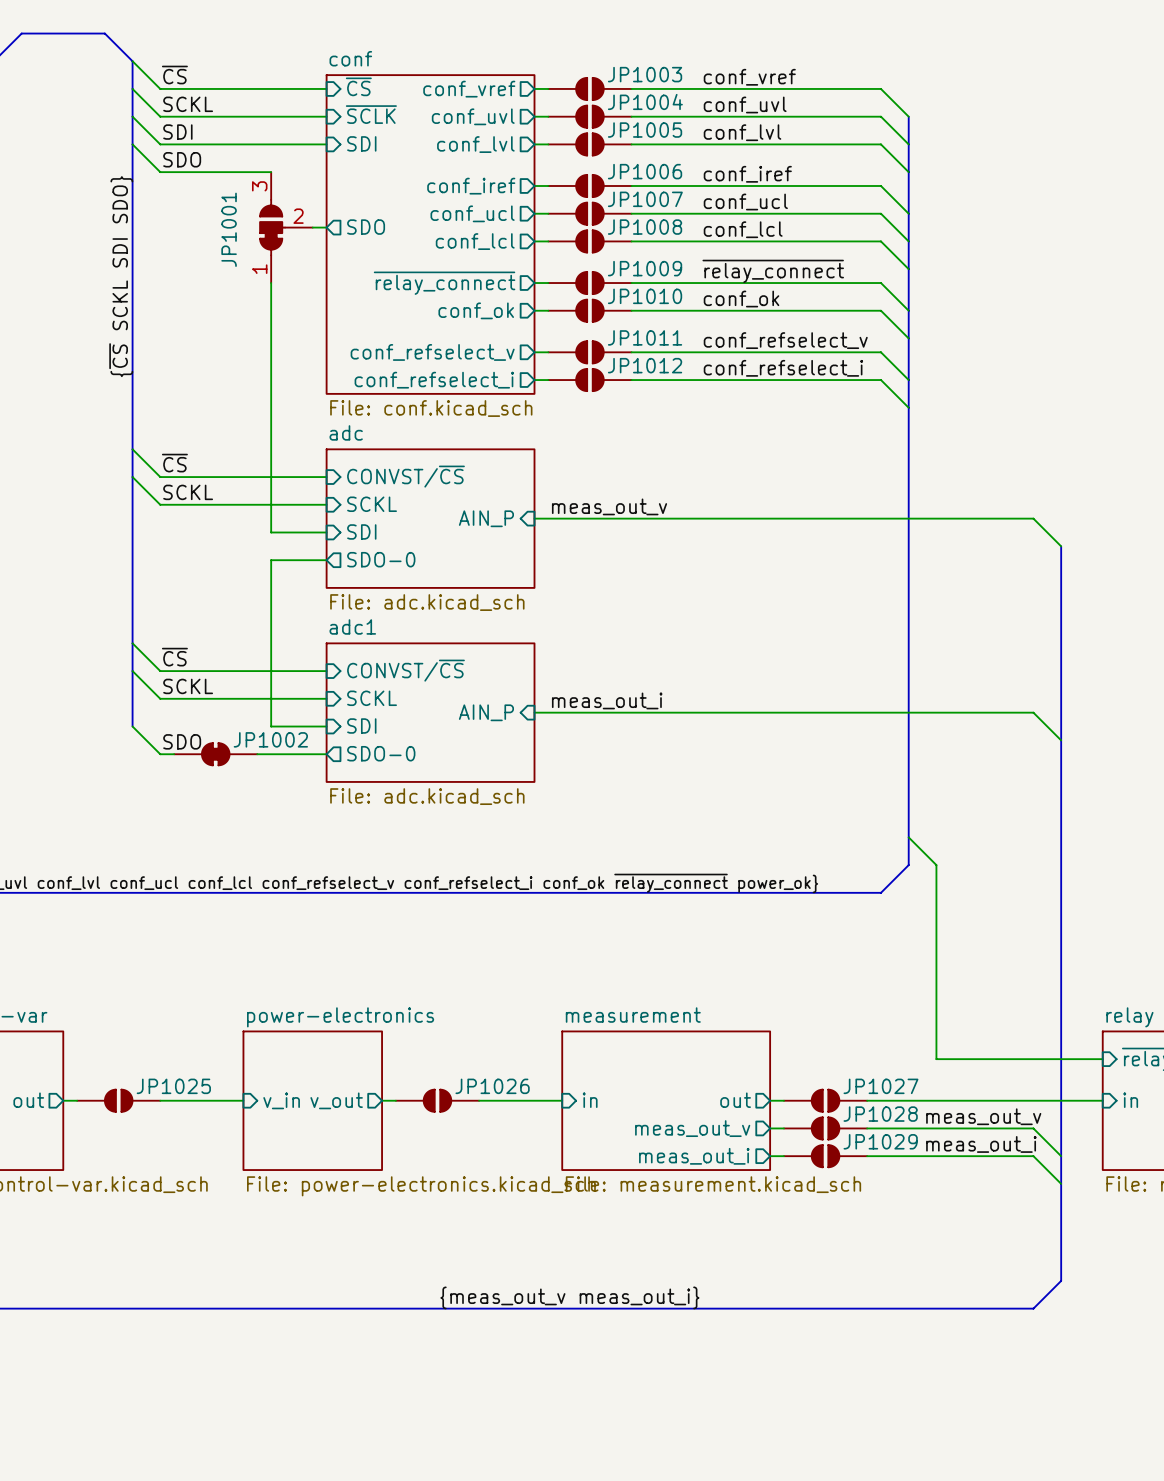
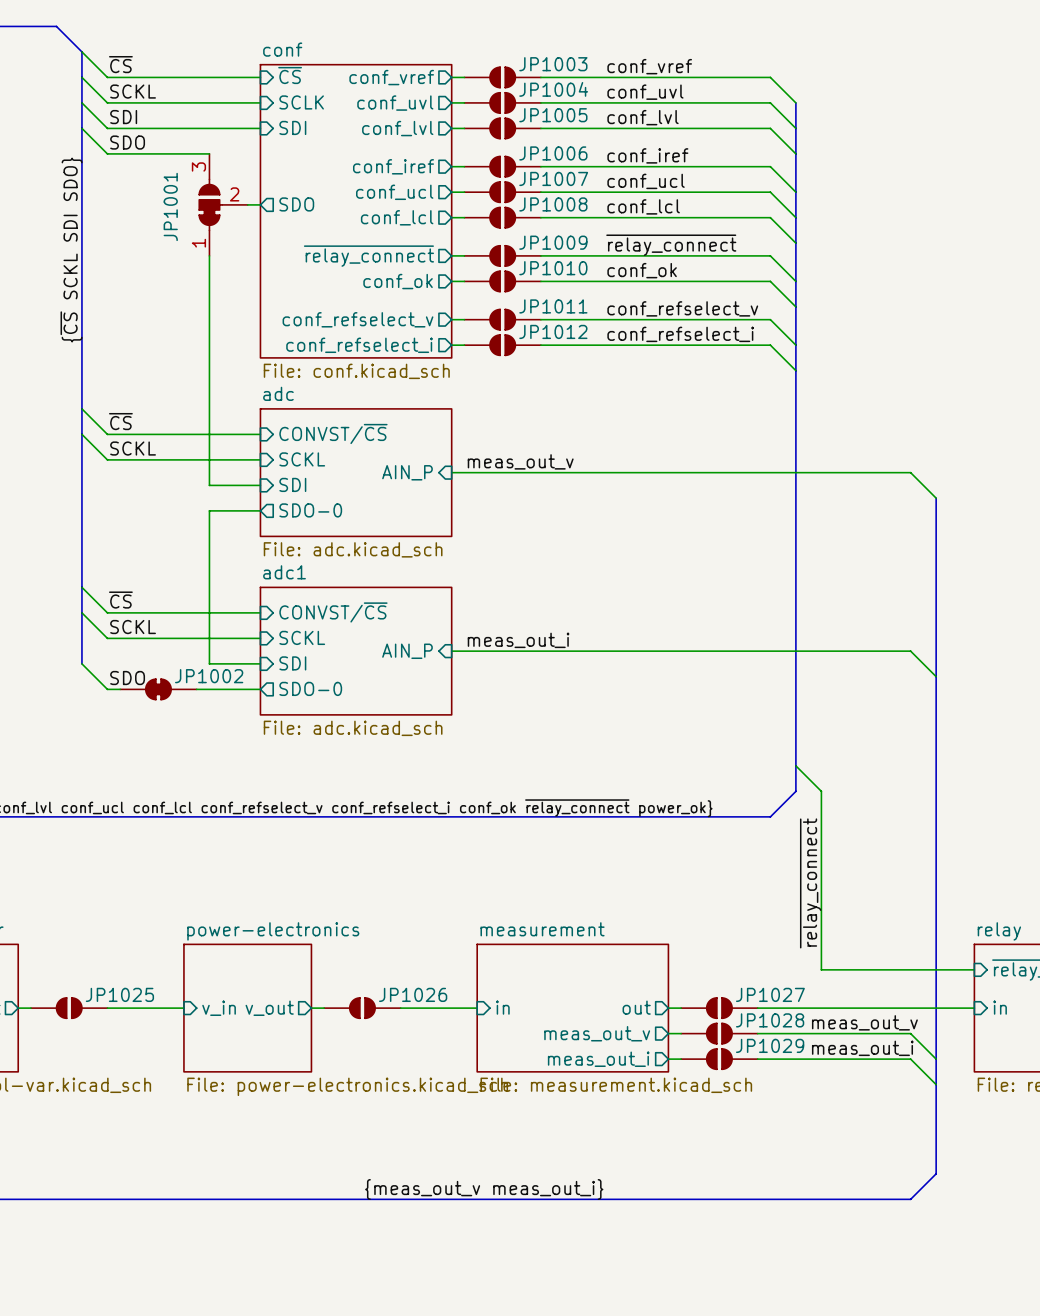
sheet pin: ~{SCLK} (371, 114) -> SCLK (301, 102)
label: none -> ~{relay_connect} (810, 883)

